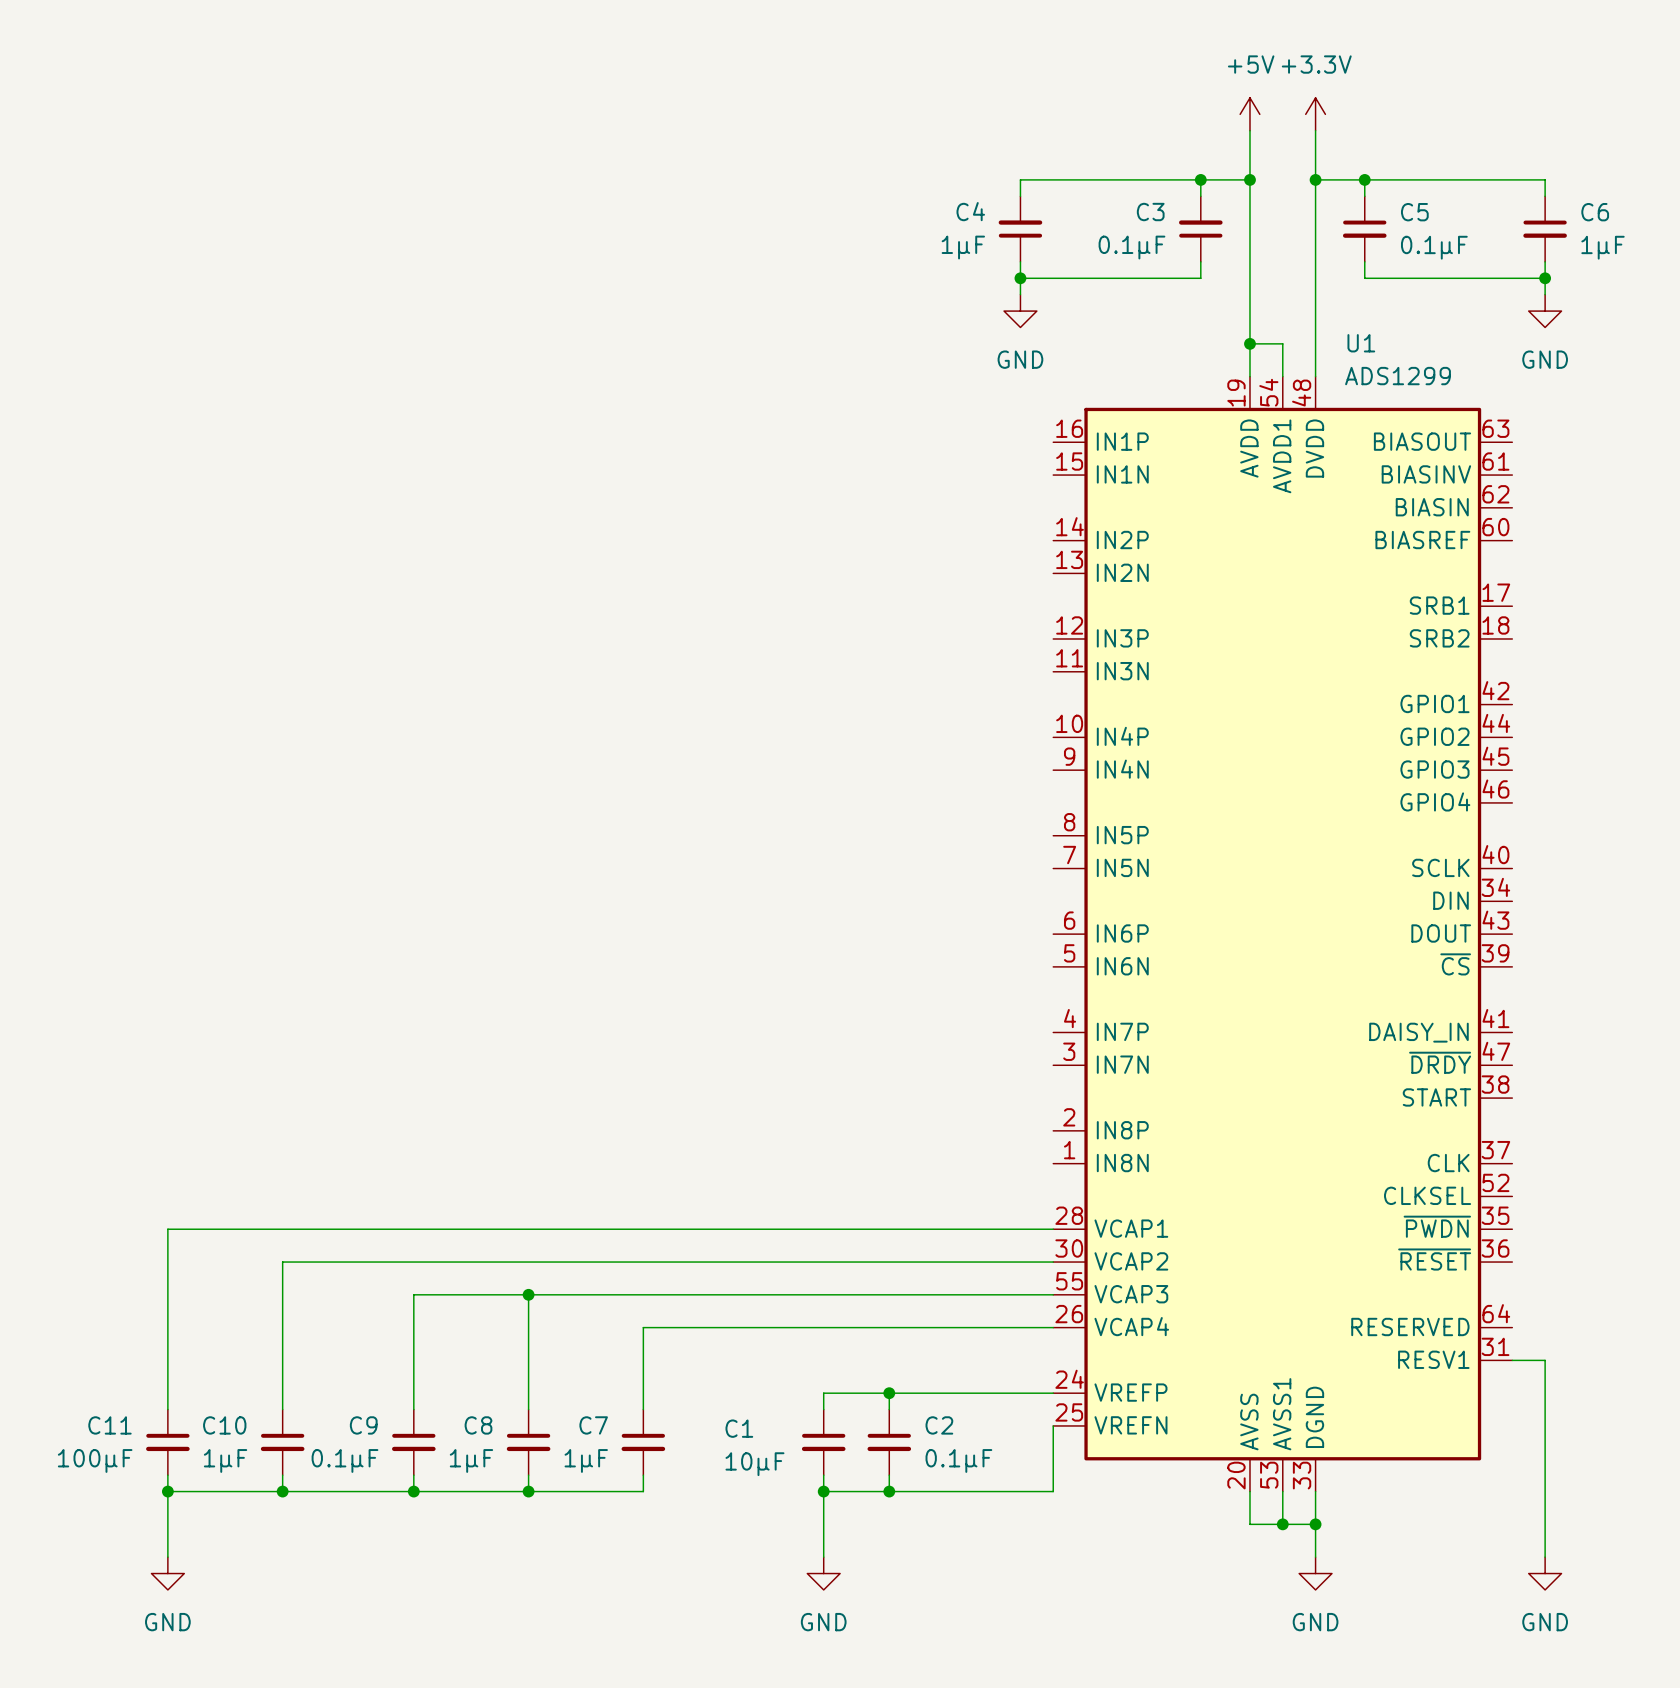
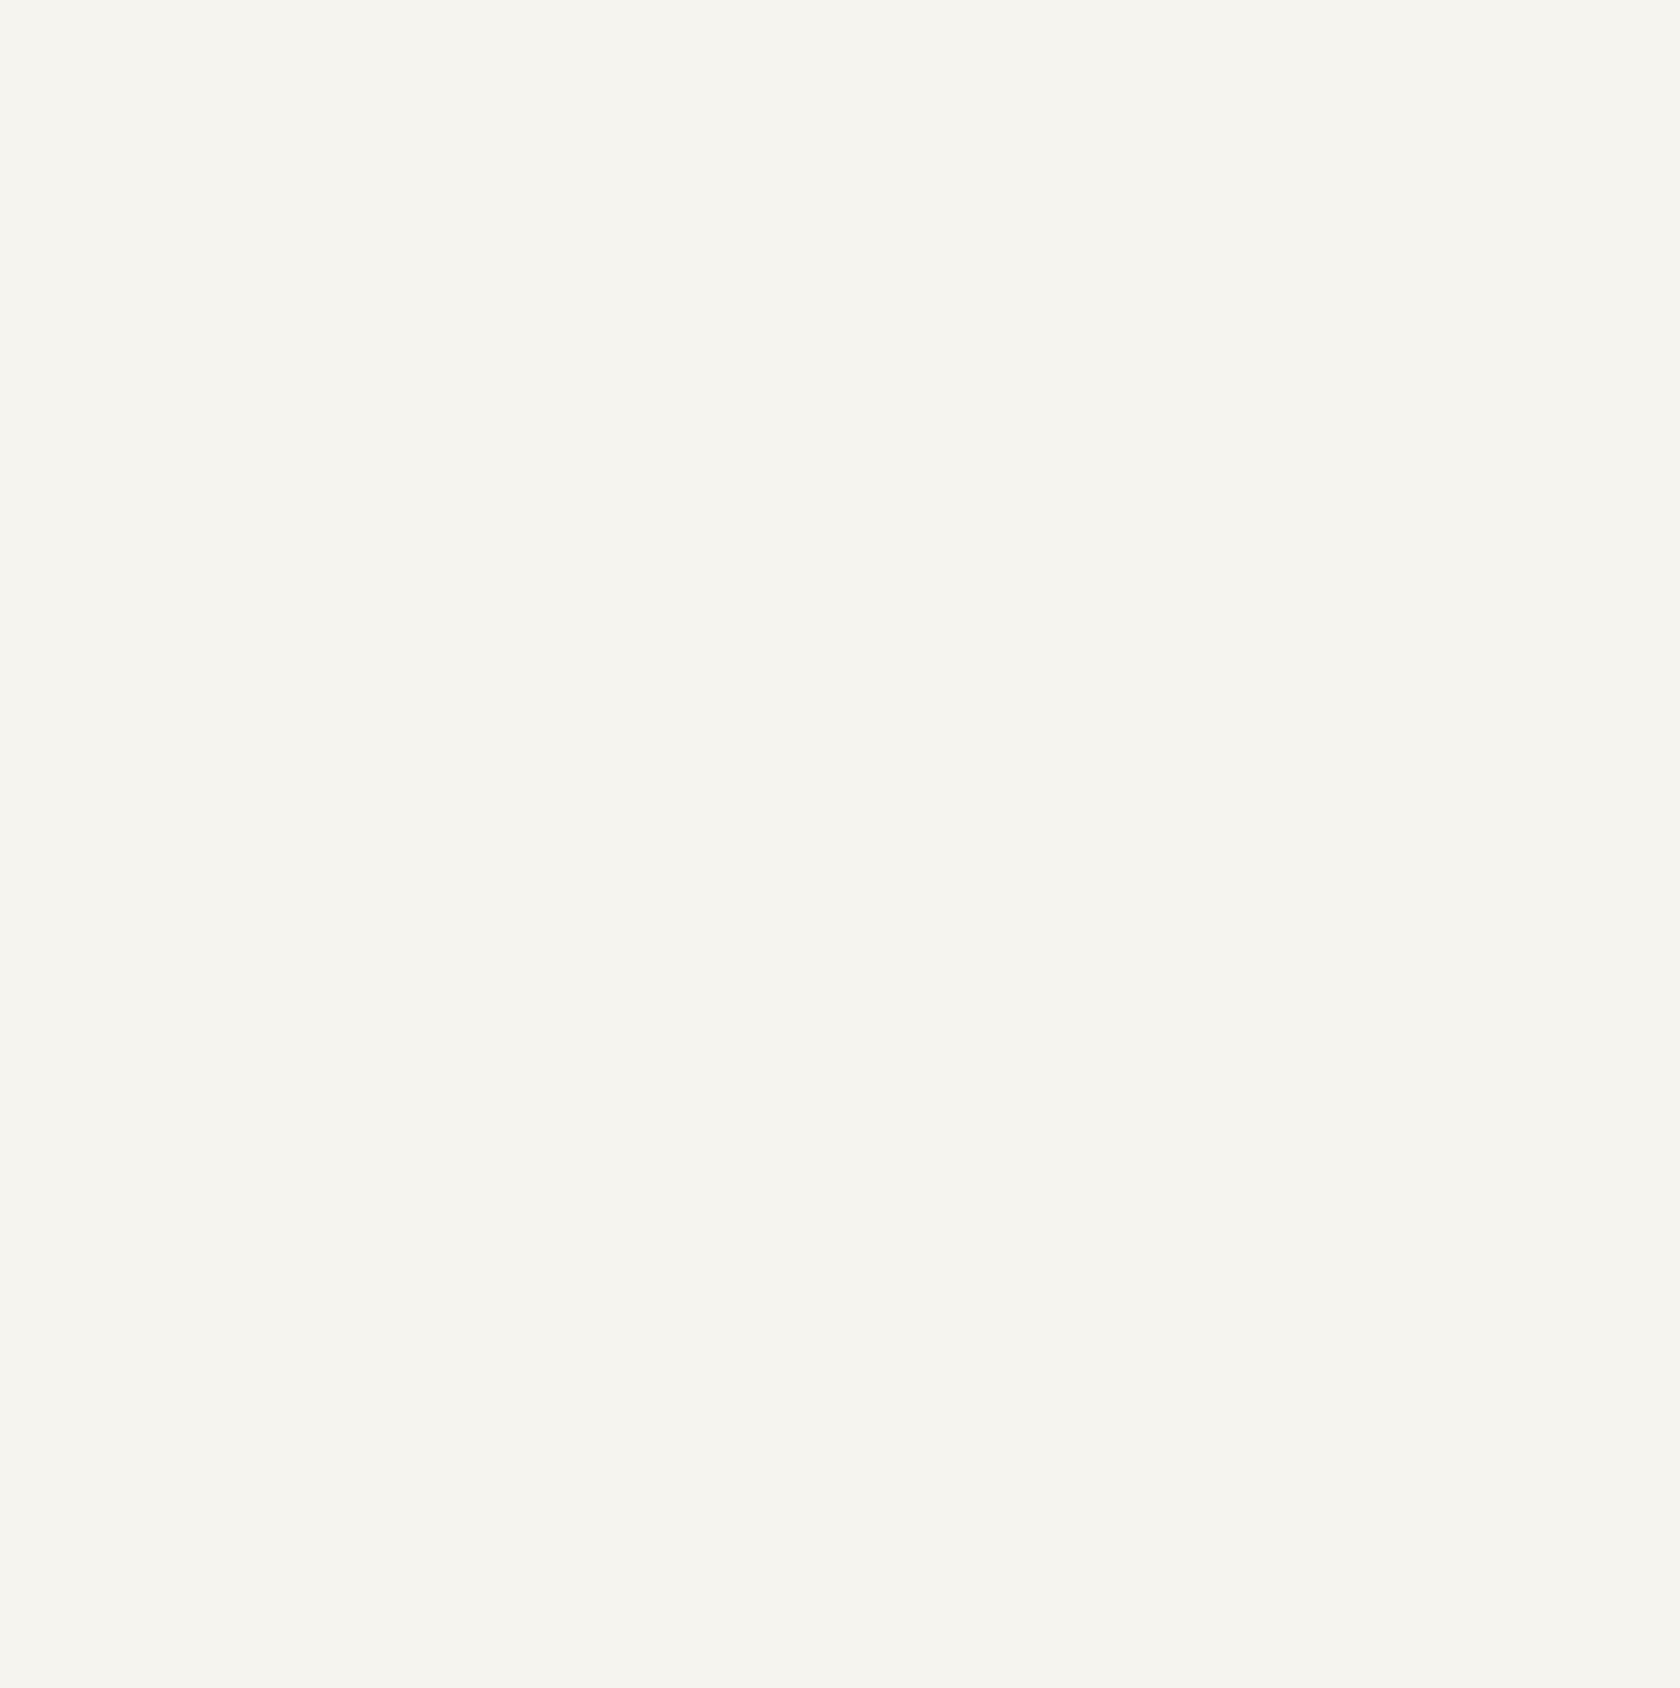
power symbol: +5V (1249, 114) -> none
power symbol: +3.3V (1315, 114) -> none
wire: (1249, 130) (1249, 376) -> none
wire: (1315, 130) (1315, 376) -> none
wire: (1200, 179) (1200, 196) -> none
junction: (1200, 179) -> none
wire: (1249, 179) (1020, 179) (1020, 196) -> none
junction: (1249, 179) -> none
wire: (1315, 179) (1545, 179) (1545, 196) -> none
junction: (1315, 179) -> none
wire: (1364, 179) (1364, 196) -> none
junction: (1364, 179) -> none
C4: 1µF (1020, 229) -> none
C3: 0.1µF (1200, 229) -> none
C5: 0.1µF (1364, 229) -> none
C6: 1µF (1545, 229) -> none
wire: (1020, 261) (1020, 294) -> none
wire: (1200, 261) (1200, 278) (1020, 278) -> none
wire: (1364, 261) (1364, 278) (1545, 278) -> none
wire: (1545, 261) (1545, 294) -> none
junction: (1020, 278) -> none
junction: (1545, 278) -> none
power symbol: GND (1020, 311) -> none
power symbol: GND (1545, 311) -> none
wire: (1249, 343) (1282, 343) (1282, 376) -> none
junction: (1249, 343) -> none
U1: ADS1299 (1282, 934) -> none
wire: (1053, 1229) (167, 1229) (167, 1409) -> none
wire: (1053, 1262) (282, 1262) (282, 1409) -> none
wire: (528, 1294) (528, 1409) -> none
junction: (528, 1294) -> none
wire: (1053, 1294) (413, 1294) (413, 1409) -> none
wire: (1053, 1327) (643, 1327) (643, 1409) -> none
wire: (1512, 1360) (1545, 1360) (1545, 1557) -> none
wire: (889, 1393) (889, 1409) -> none
junction: (889, 1393) -> none
wire: (1053, 1393) (823, 1393) (823, 1409) -> none
wire: (1053, 1425) (1053, 1491) (823, 1491) -> none
C11: 100µF (167, 1442) -> none
C10: 1µF (282, 1442) -> none
C9: 0.1µF (413, 1442) -> none
C8: 1µF (528, 1442) -> none
C7: 1µF (643, 1442) -> none
C1: 10µF (823, 1442) -> none
C2: 0.1µF (889, 1442) -> none
wire: (167, 1475) (167, 1557) -> none
wire: (282, 1475) (282, 1491) -> none
wire: (413, 1475) (413, 1491) -> none
wire: (528, 1475) (528, 1491) -> none
wire: (643, 1475) (643, 1491) (167, 1491) -> none
wire: (823, 1475) (823, 1557) -> none
wire: (889, 1475) (889, 1491) -> none
junction: (167, 1491) -> none
junction: (282, 1491) -> none
junction: (413, 1491) -> none
junction: (528, 1491) -> none
junction: (823, 1491) -> none
junction: (889, 1491) -> none
wire: (1249, 1491) (1249, 1524) (1315, 1524) -> none
wire: (1282, 1491) (1282, 1524) -> none
wire: (1315, 1491) (1315, 1557) -> none
junction: (1282, 1524) -> none
junction: (1315, 1524) -> none
power symbol: GND (167, 1573) -> none
power symbol: GND (823, 1573) -> none
power symbol: GND (1315, 1573) -> none
power symbol: GND (1545, 1573) -> none

